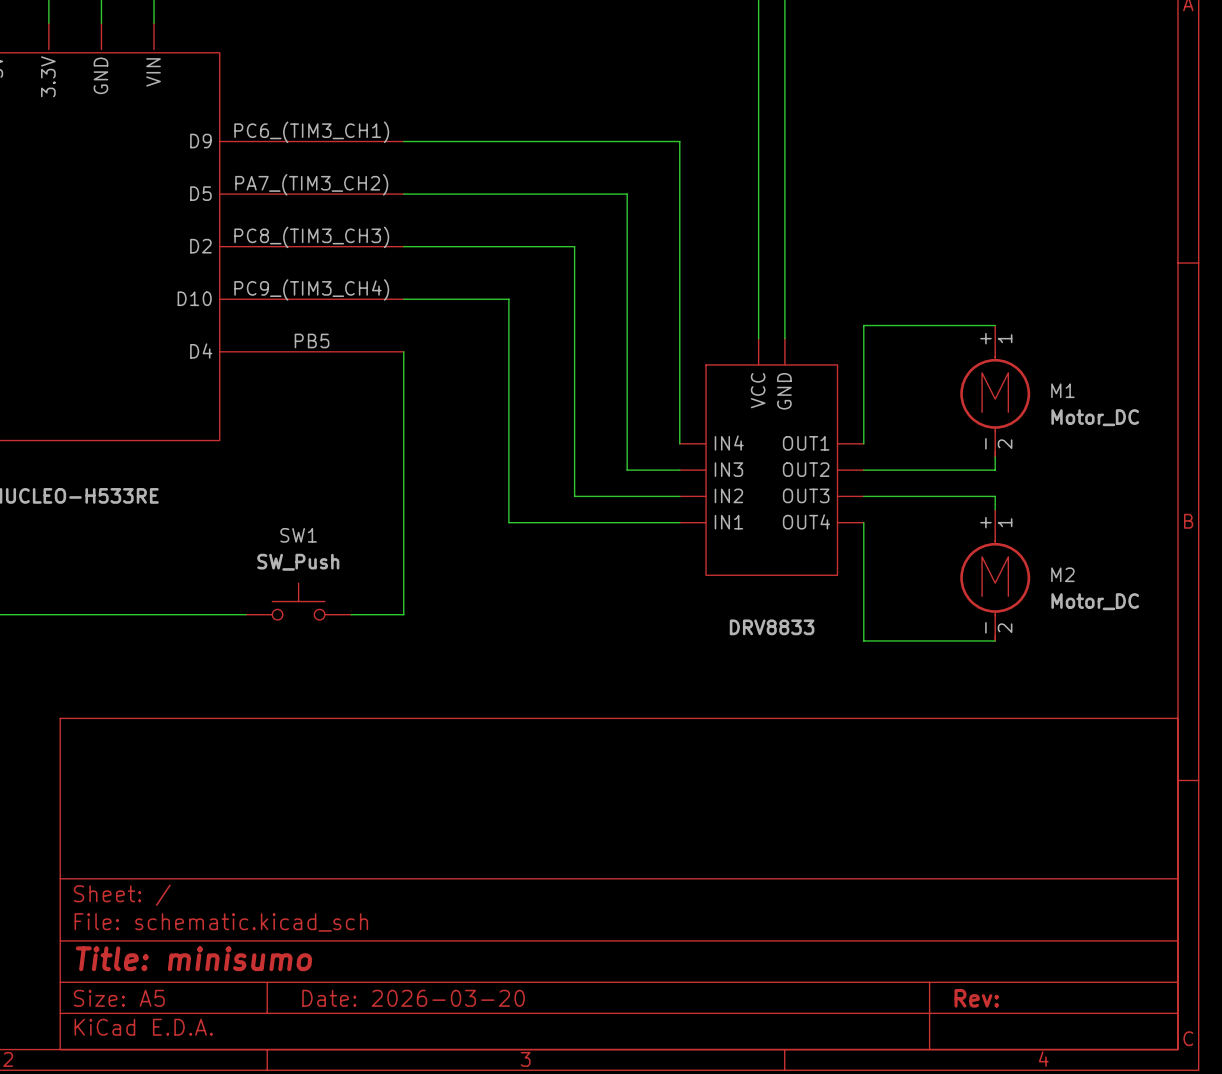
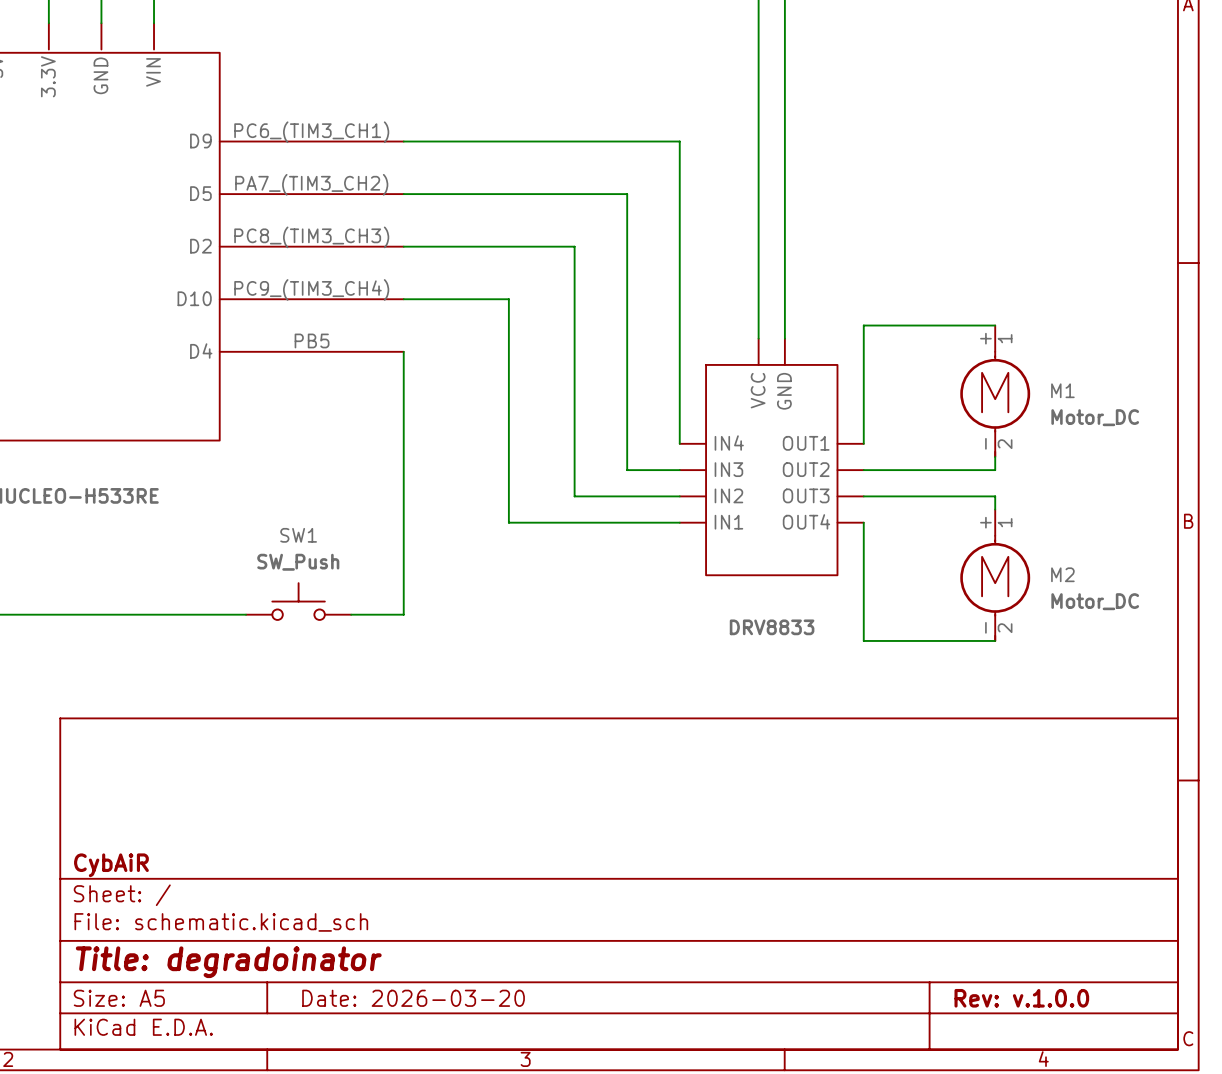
title block: none -> CybAiR (111, 865)
title block: Title: minisumo (194, 958) -> Title: degradoinator (228, 962)
title block: Rev: (976, 998) -> Rev: v.1.0.0 (1021, 998)

